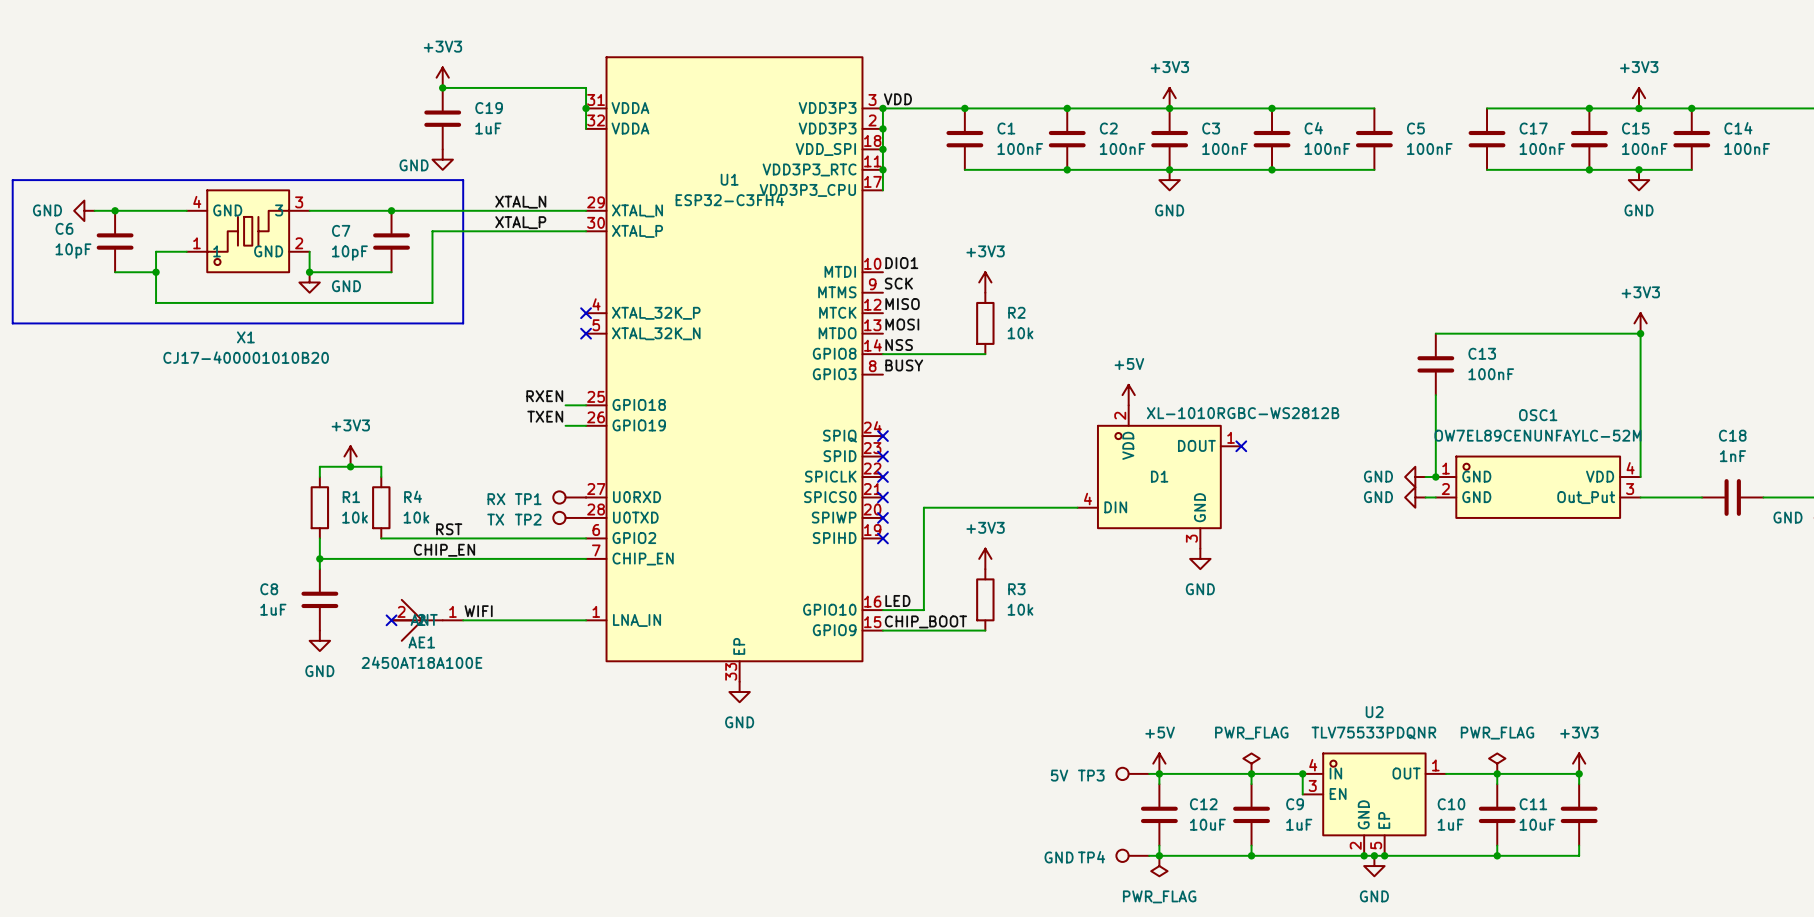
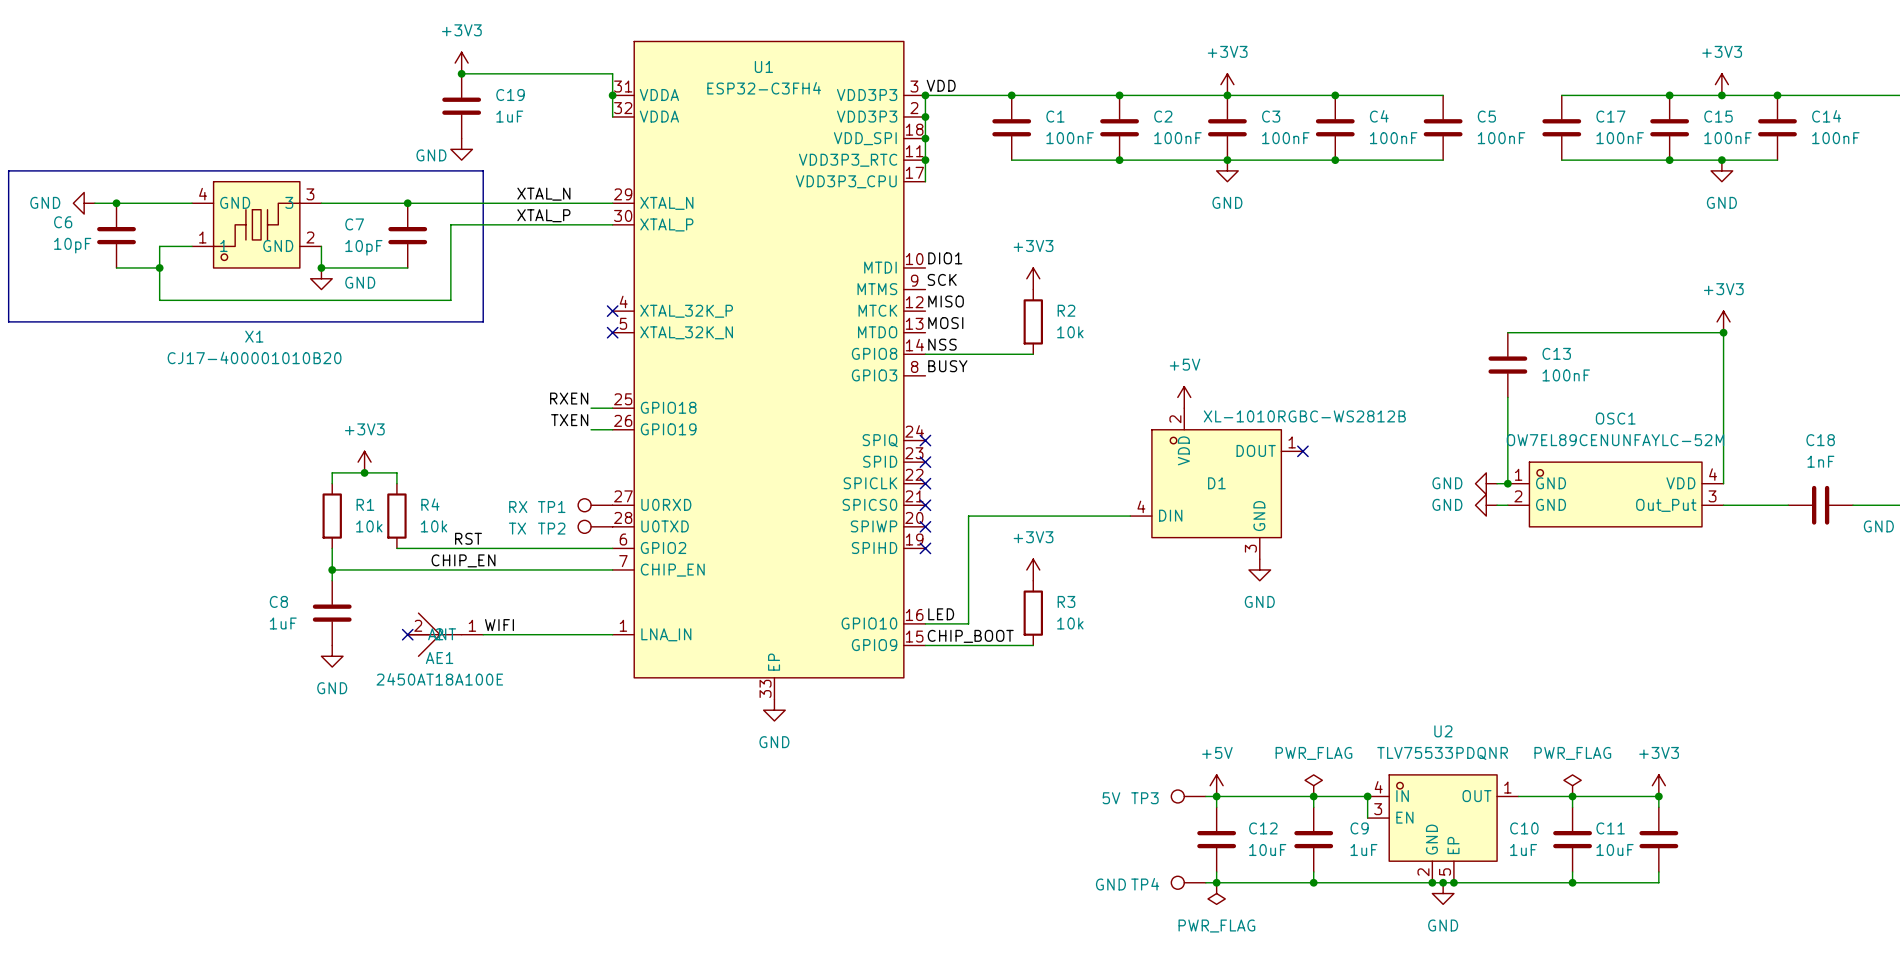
U1 name position: U1 (729, 179) -> U1 (763, 66)
U1 value position: ESP32-C3FH4 (729, 199) -> ESP32-C3FH4 (764, 88)

